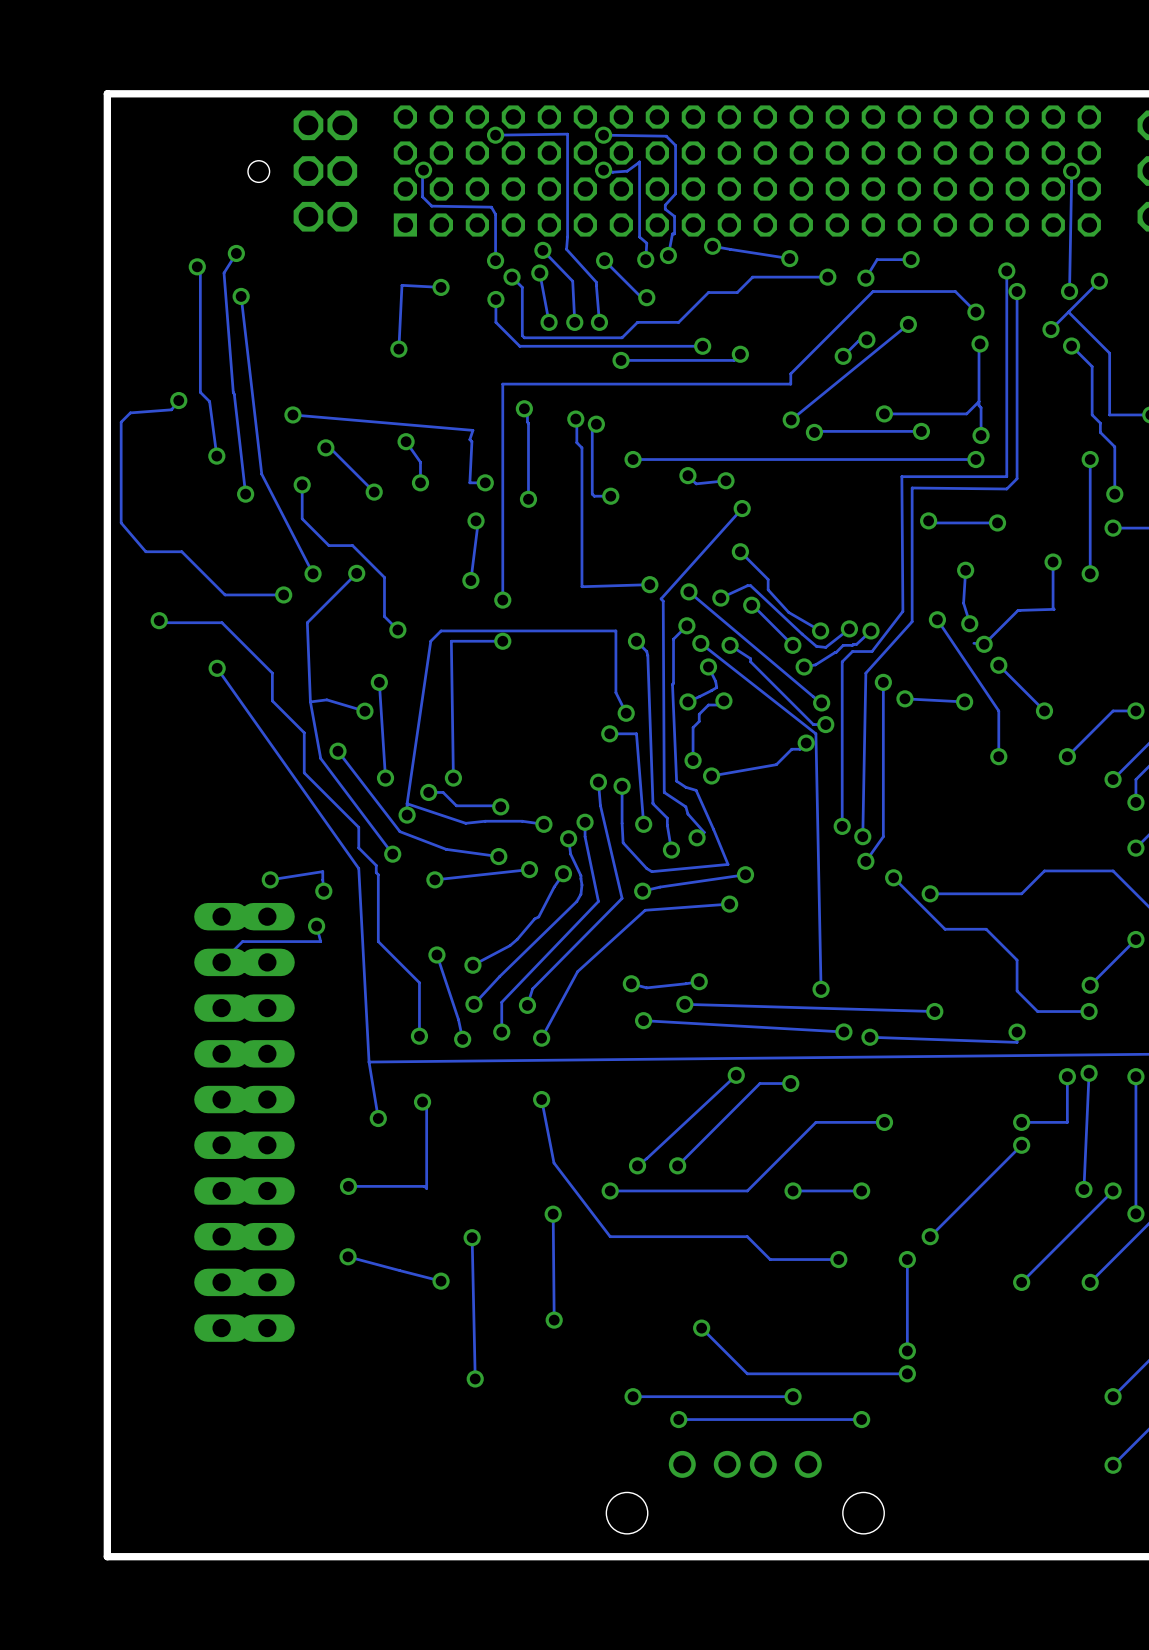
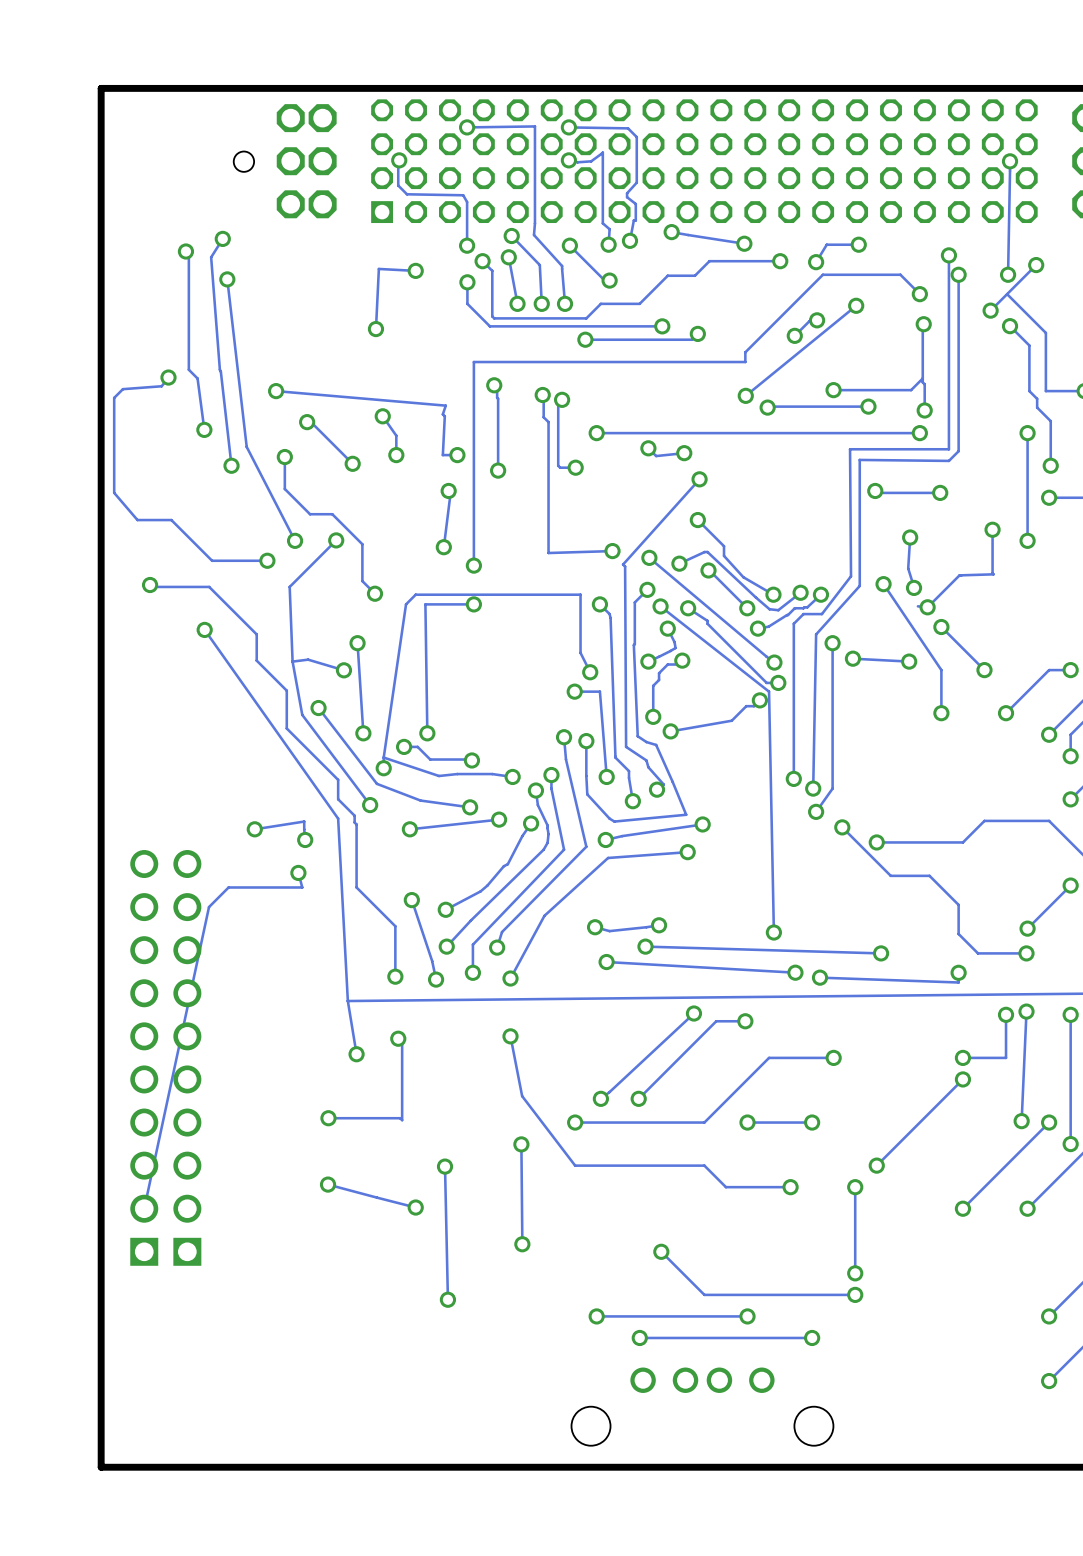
track: none -> (209, 907) (144, 1208)
part: none -> (144, 1057)
part: none -> (187, 1057)
part: (221, 1122) -> none
part: (267, 1122) -> none

